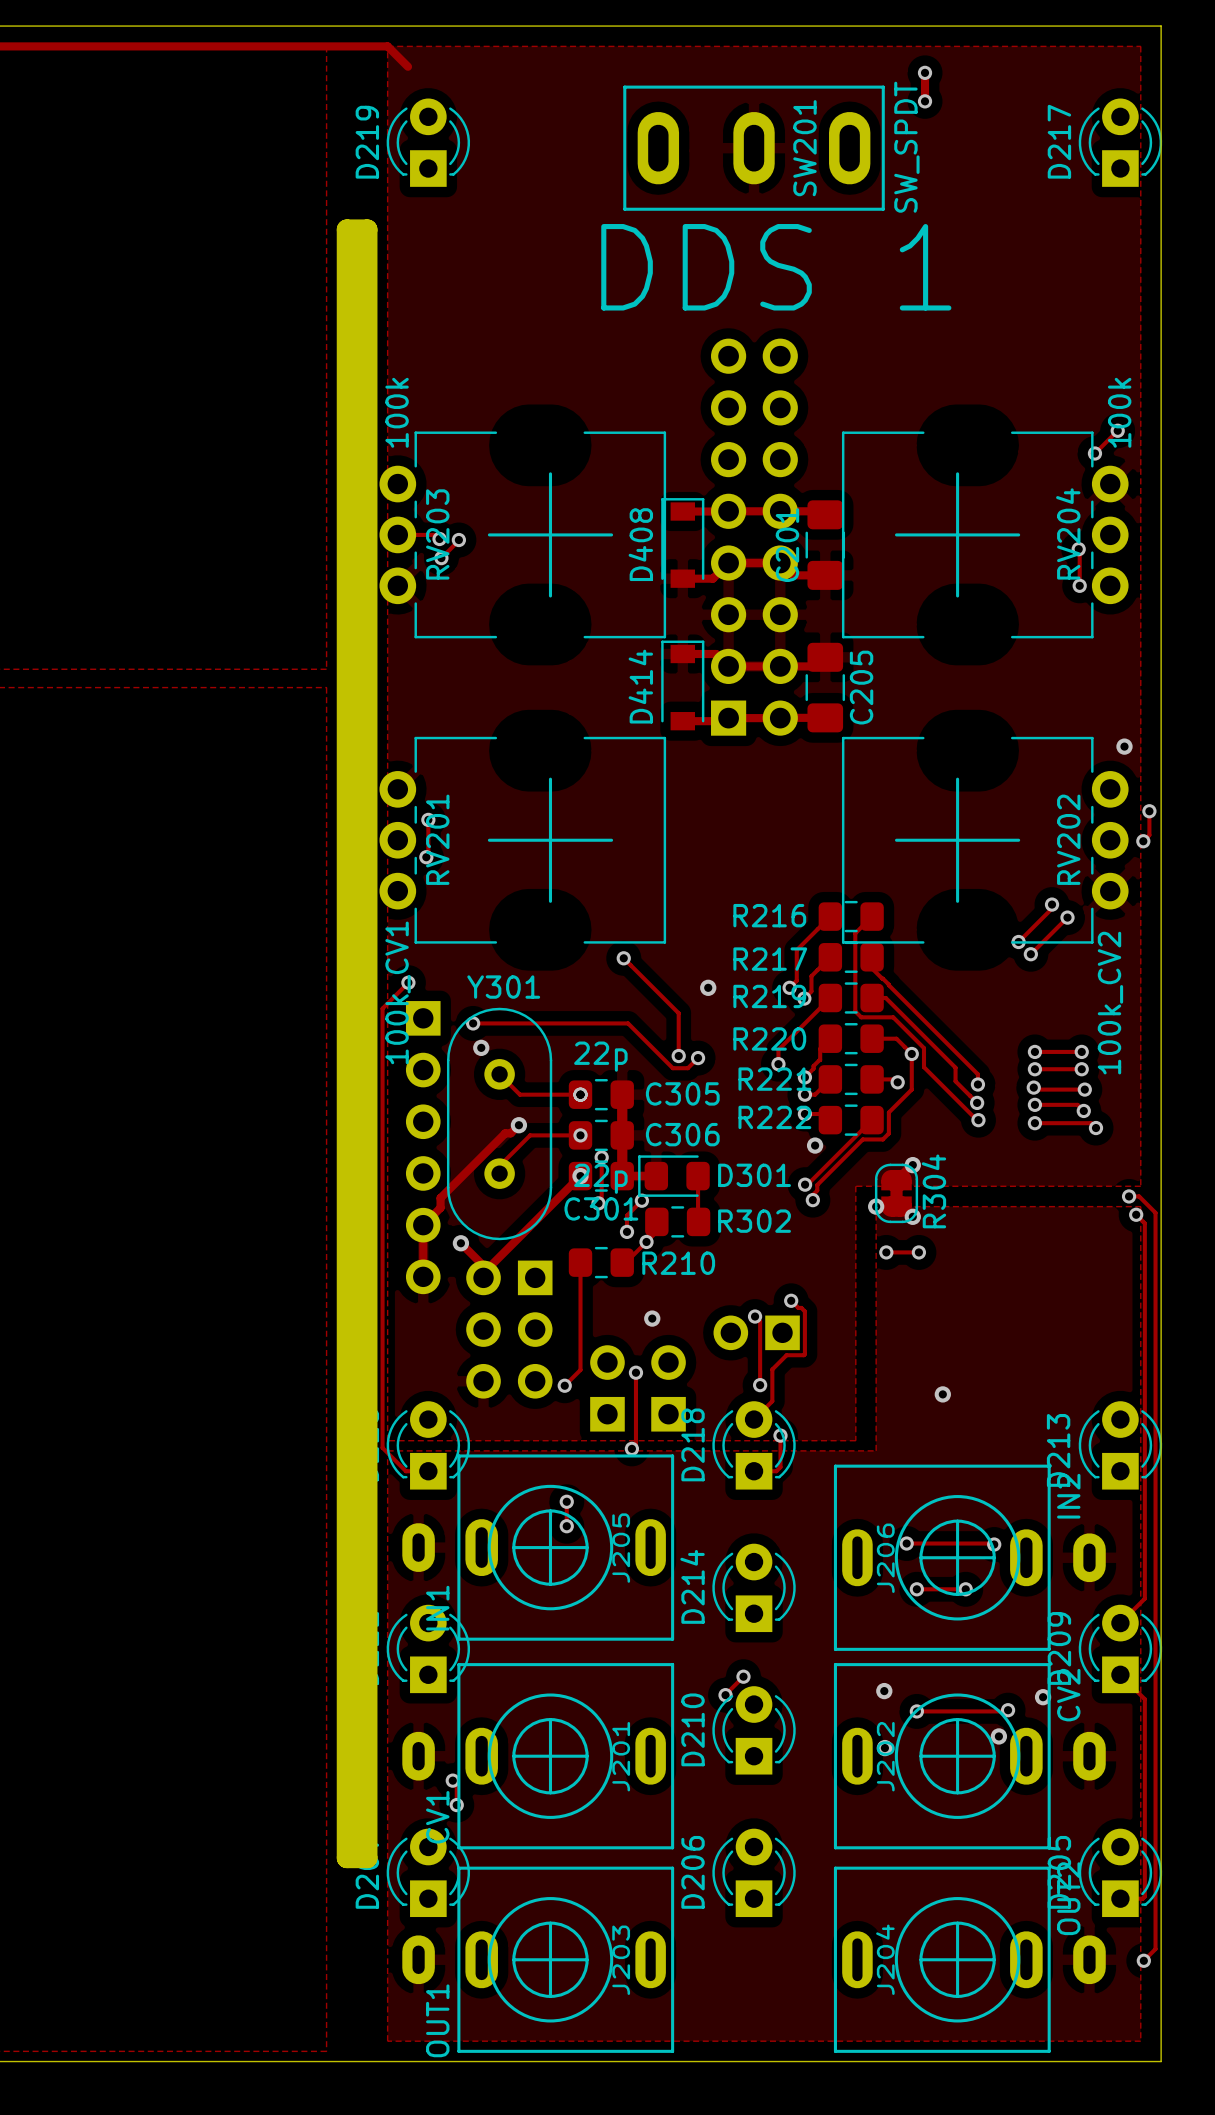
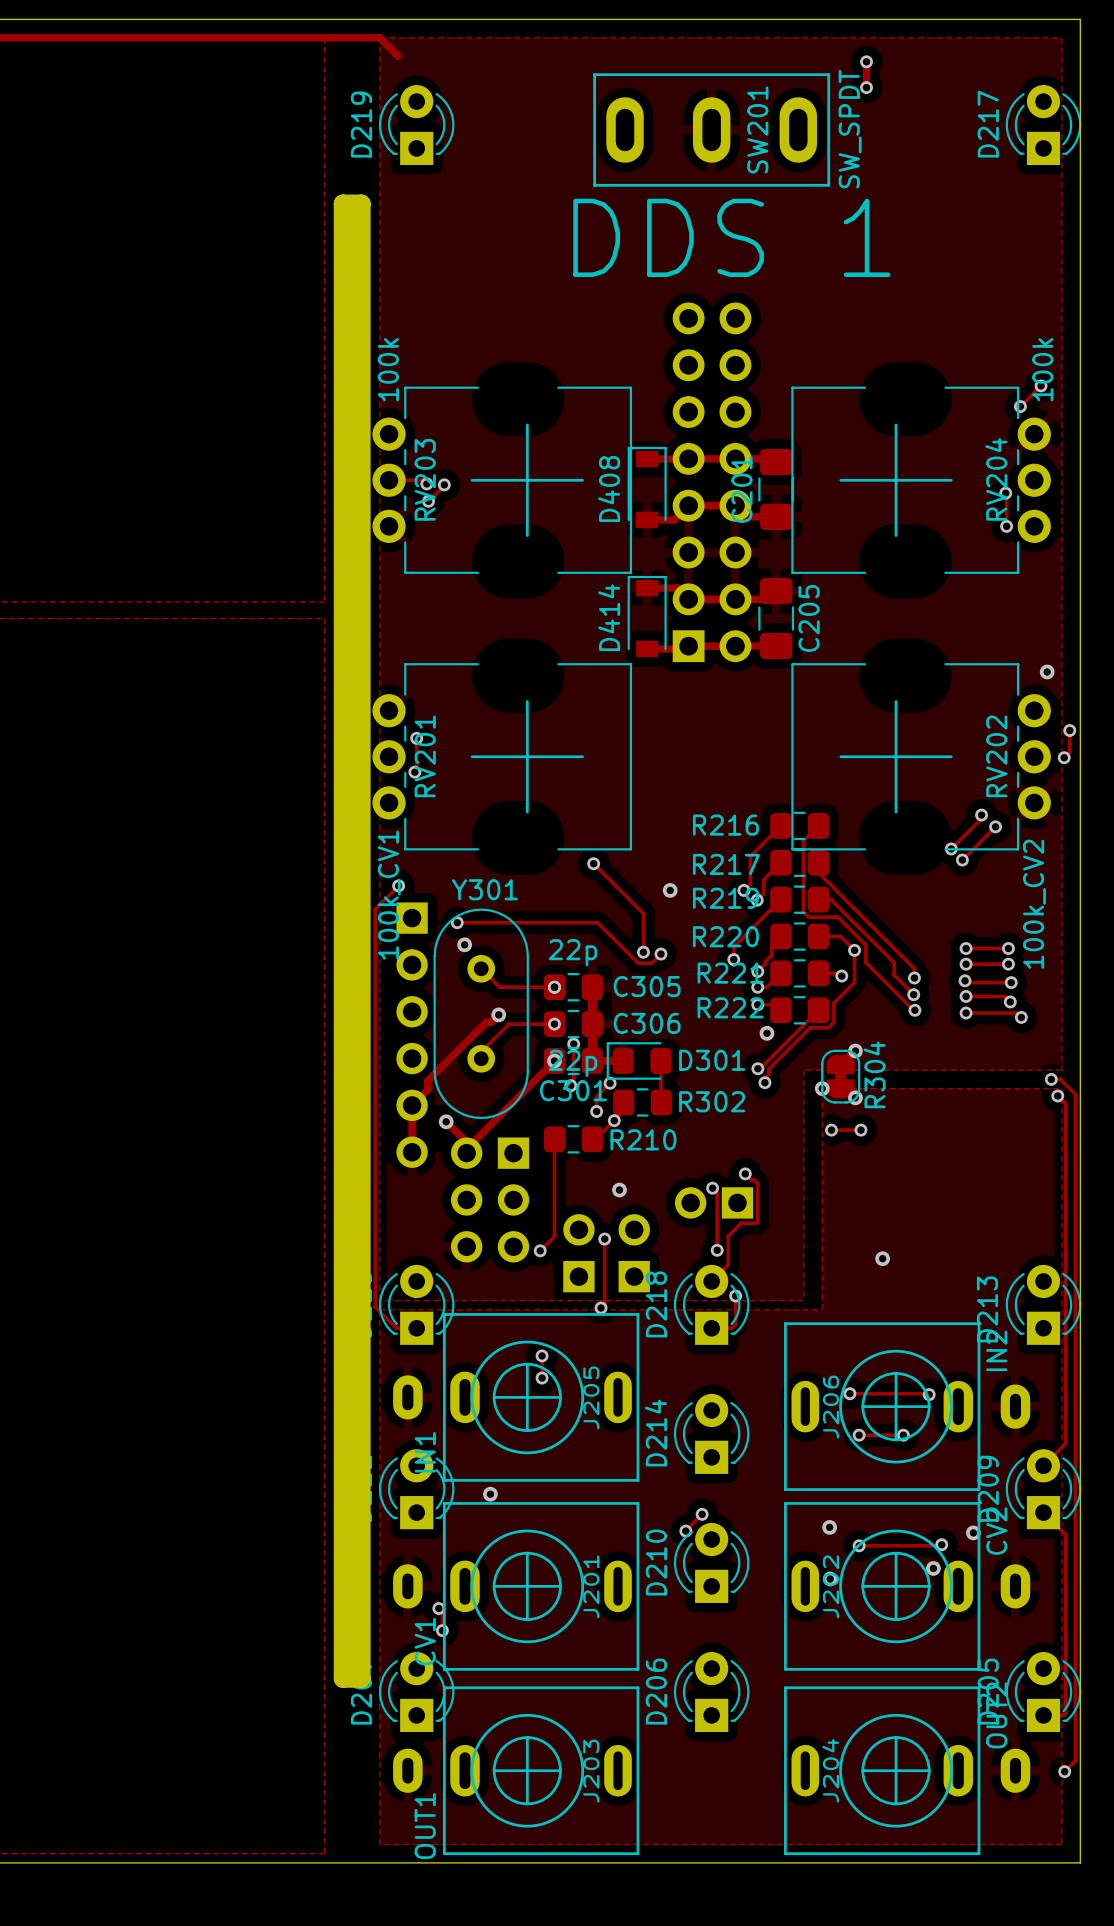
via: none -> (490, 1494)

